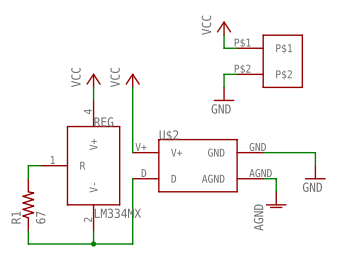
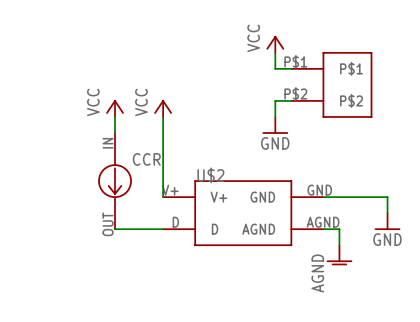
CCR: none -> (115, 181)
wire: (41, 165) (28, 165) (28, 178) -> none
REG: LM334MX (80, 165) -> none
wire: (132, 178) (132, 243) (28, 243) (28, 230) -> (163, 229) (115, 229)
R1: 67 (28, 204) -> none
wire: (93, 230) (93, 243) -> none
junction: (93, 243) -> none

